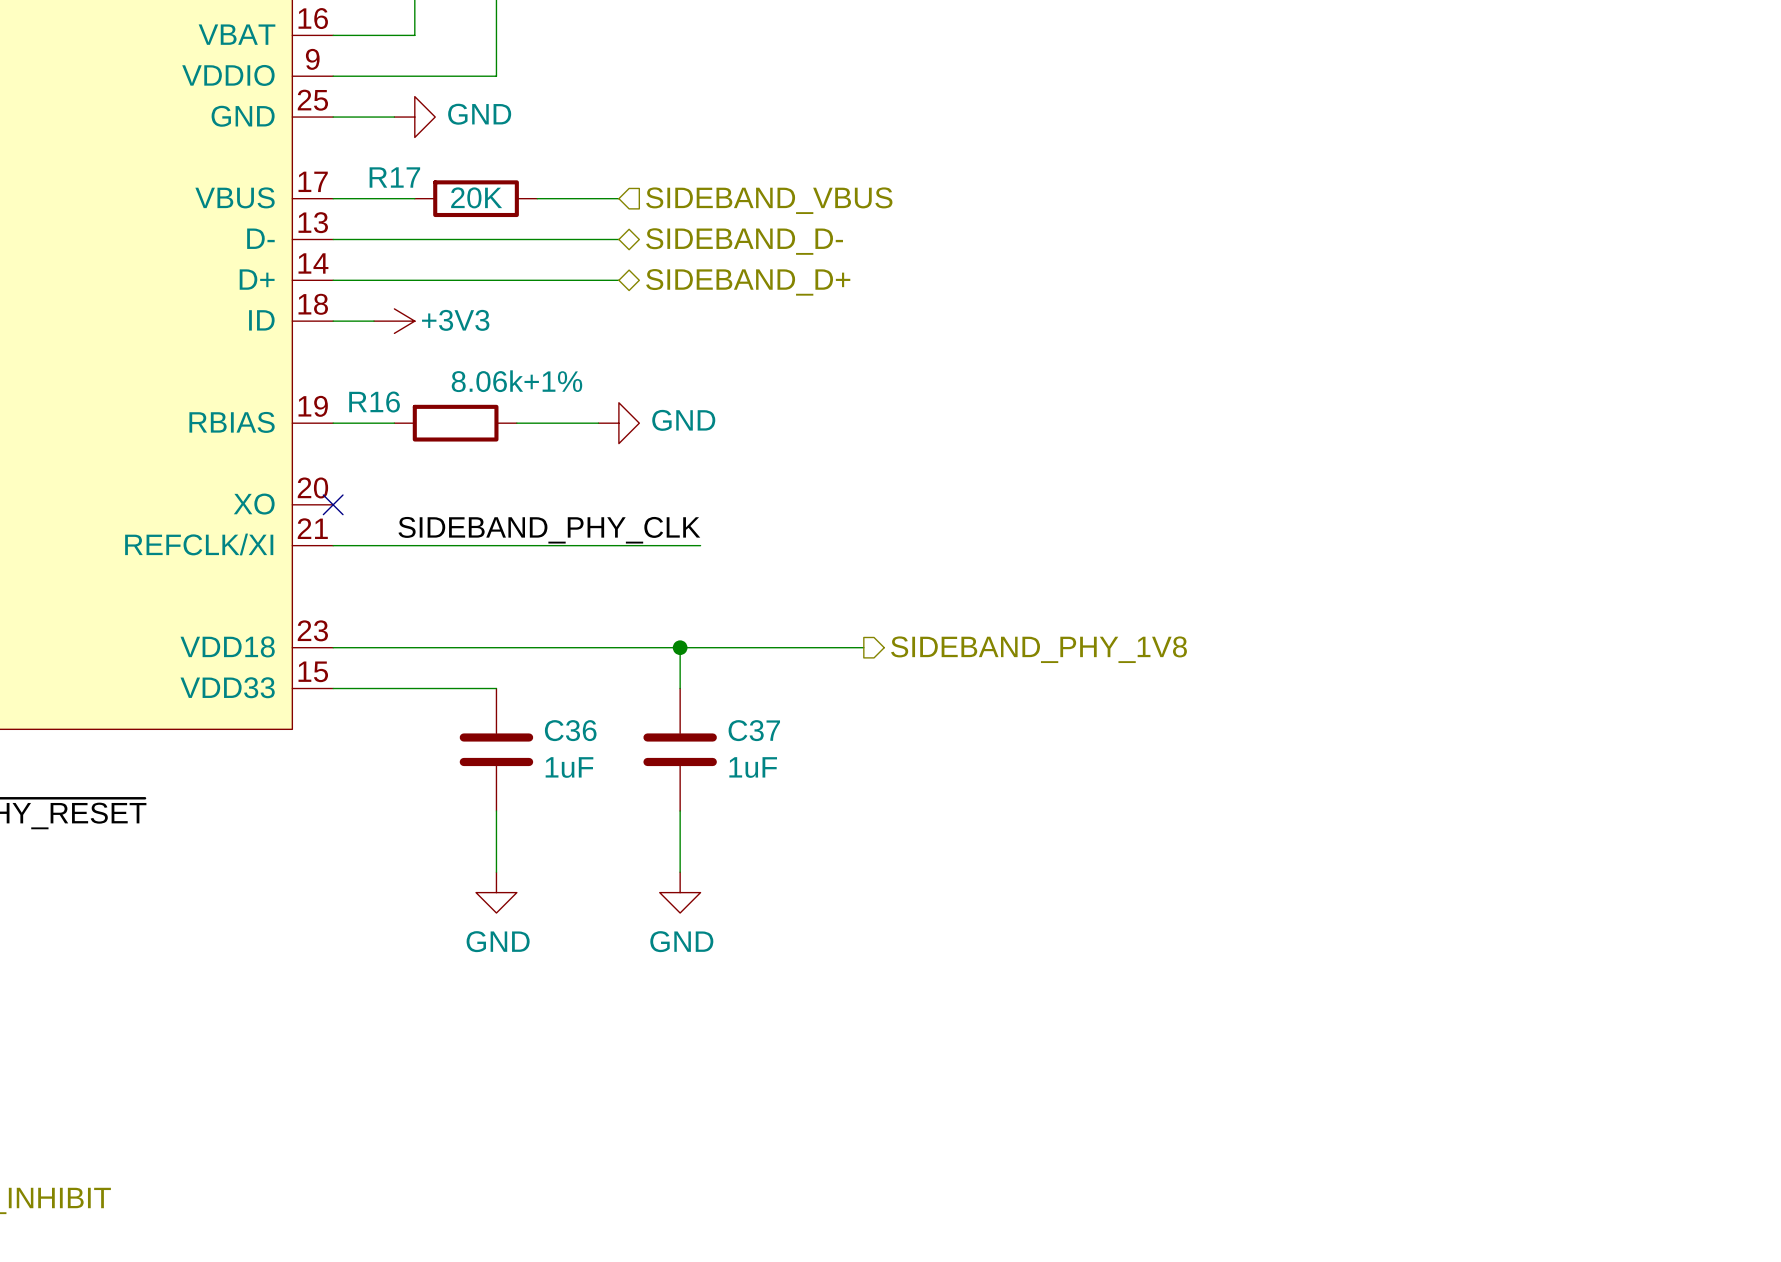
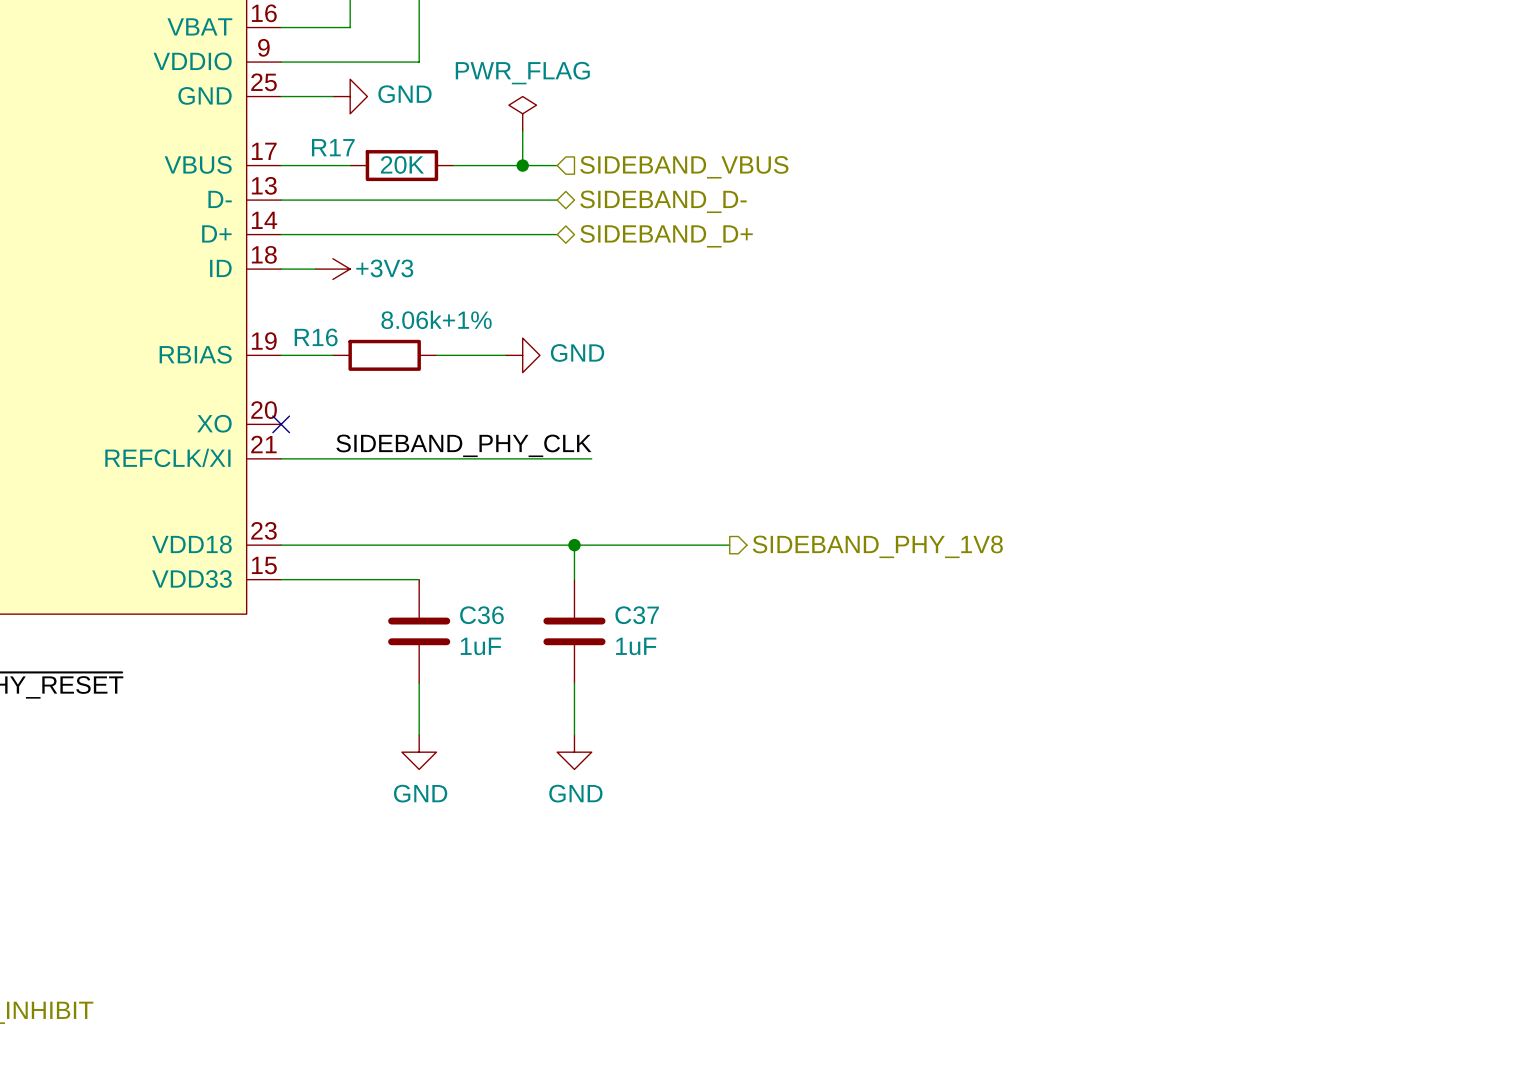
power symbol: none -> PWR_FLAG (522, 113)
wire: none -> (522, 131) (522, 165) (557, 165)
junction: none -> (522, 165)
hierarchical label position: SIDEBAND_VBUS (769, 200) -> SIDEBAND_VBUS (684, 167)
wire: none -> (522, 200) (557, 200)
hierarchical label position: SIDEBAND_D- (744, 241) -> SIDEBAND_D- (663, 201)
wire: none -> (522, 234) (557, 234)
hierarchical label position: SIDEBAND_D+ (748, 282) -> SIDEBAND_D+ (666, 236)

